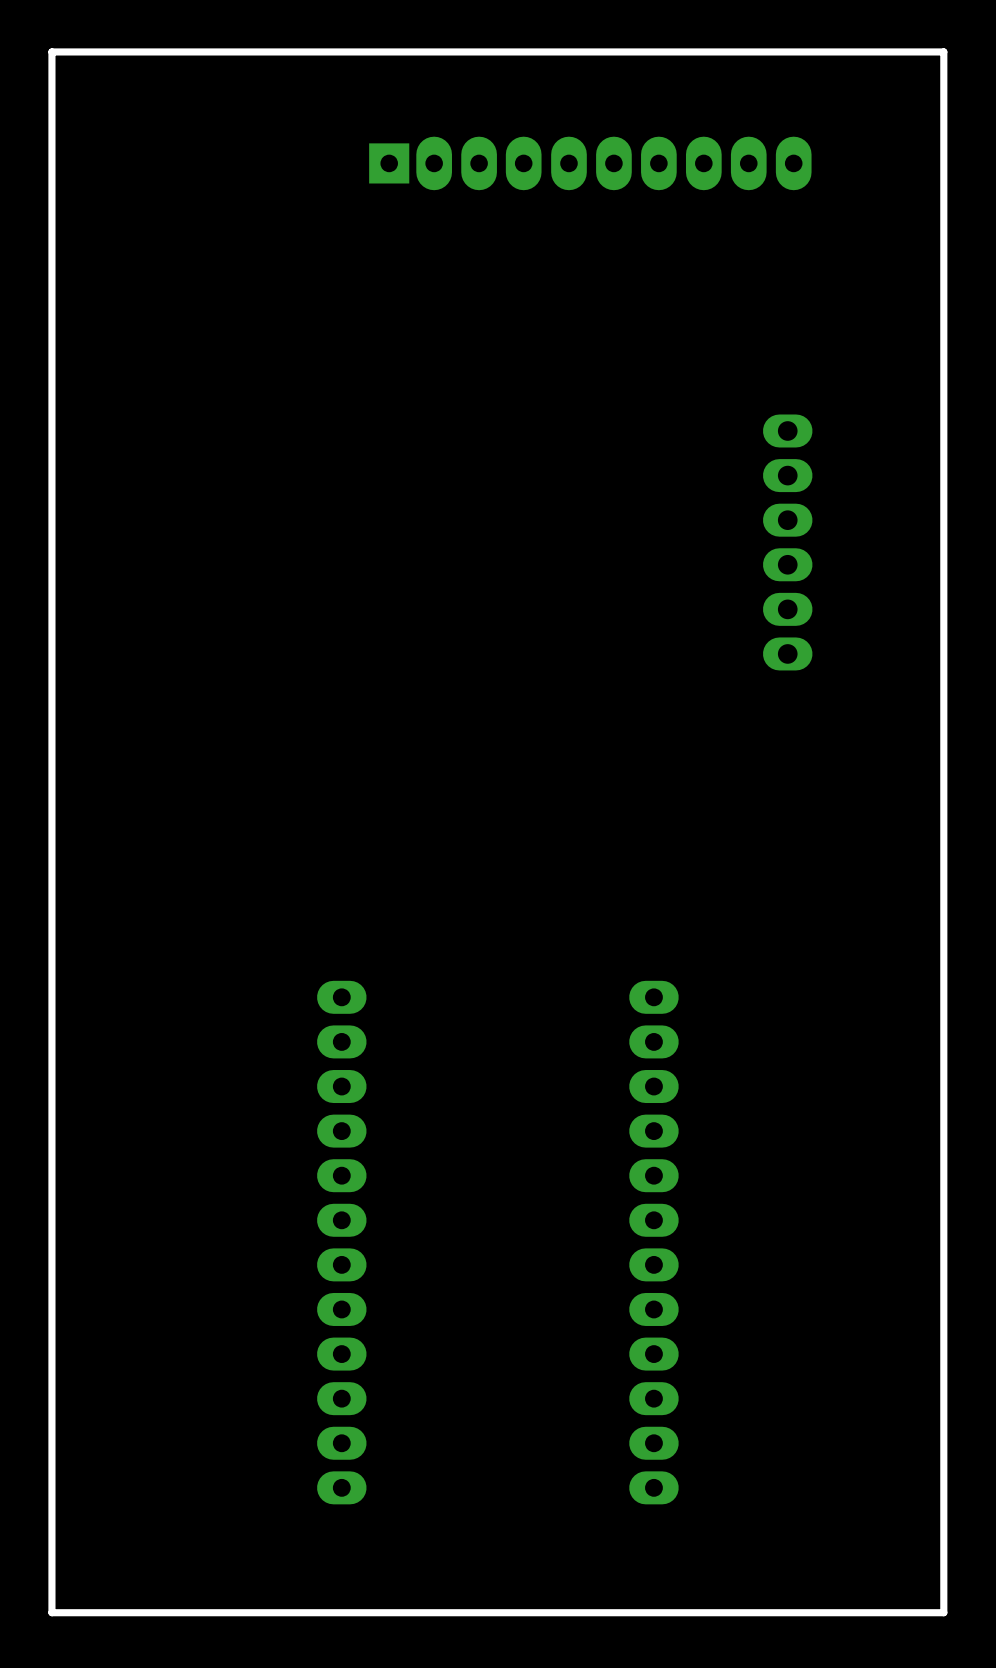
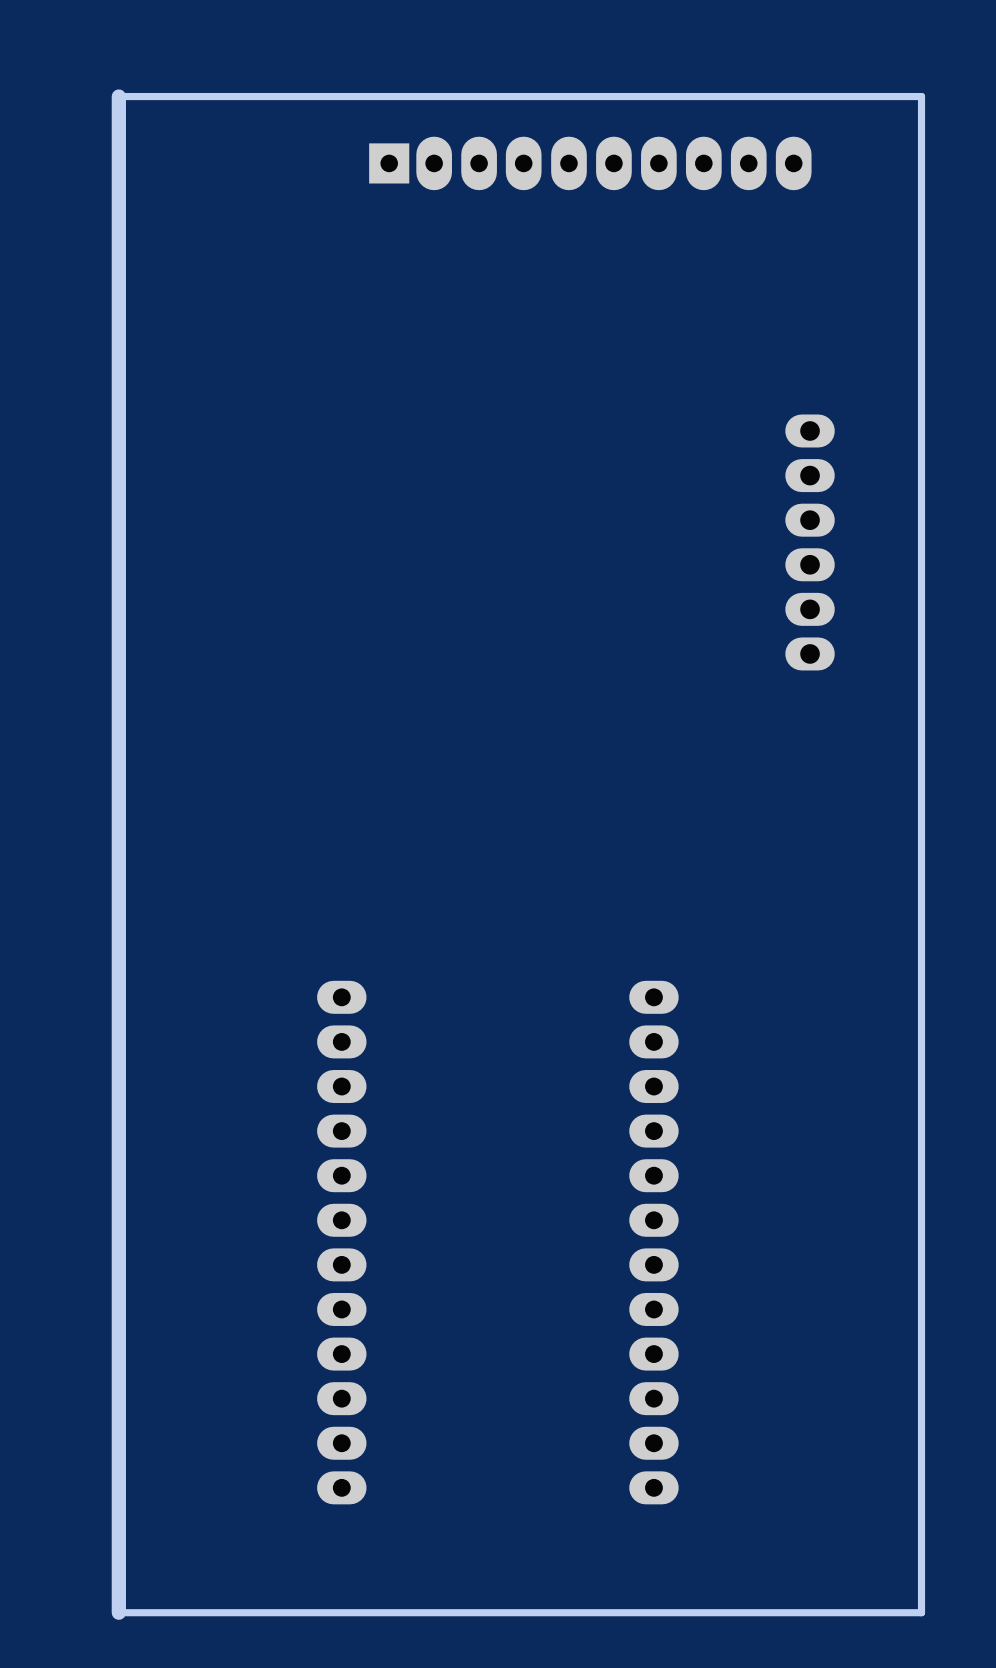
part position: (787, 542) -> (810, 542)
board edge: (921, 1612) (943, 1612) (943, 51) (51, 51) (51, 1612) (118, 1612) -> (921, 1612) (921, 96) (118, 96) (118, 1612)

